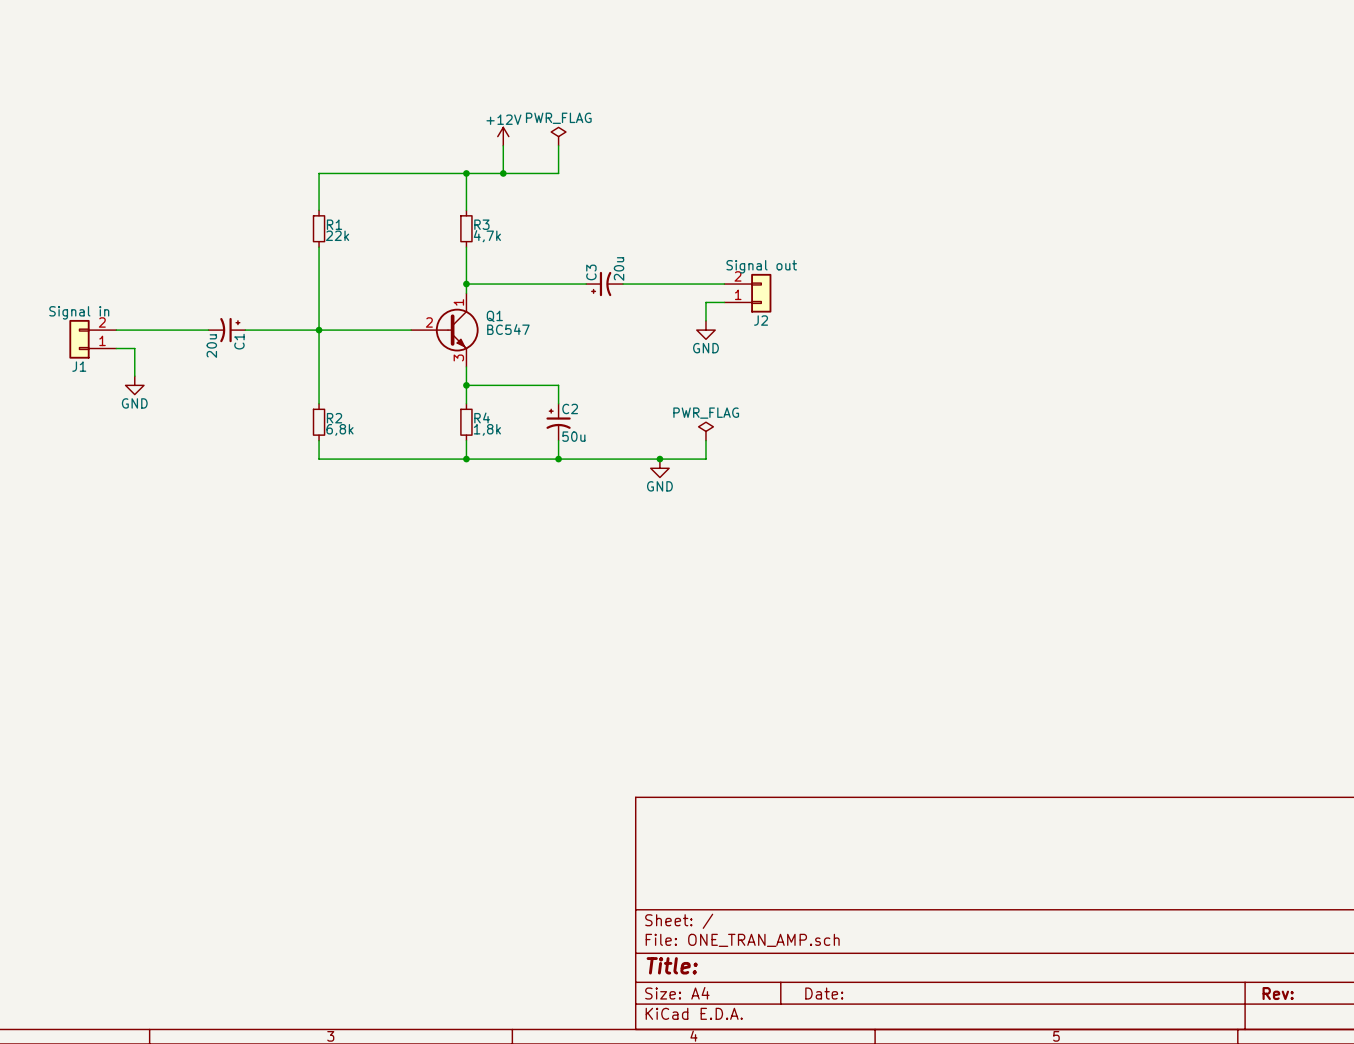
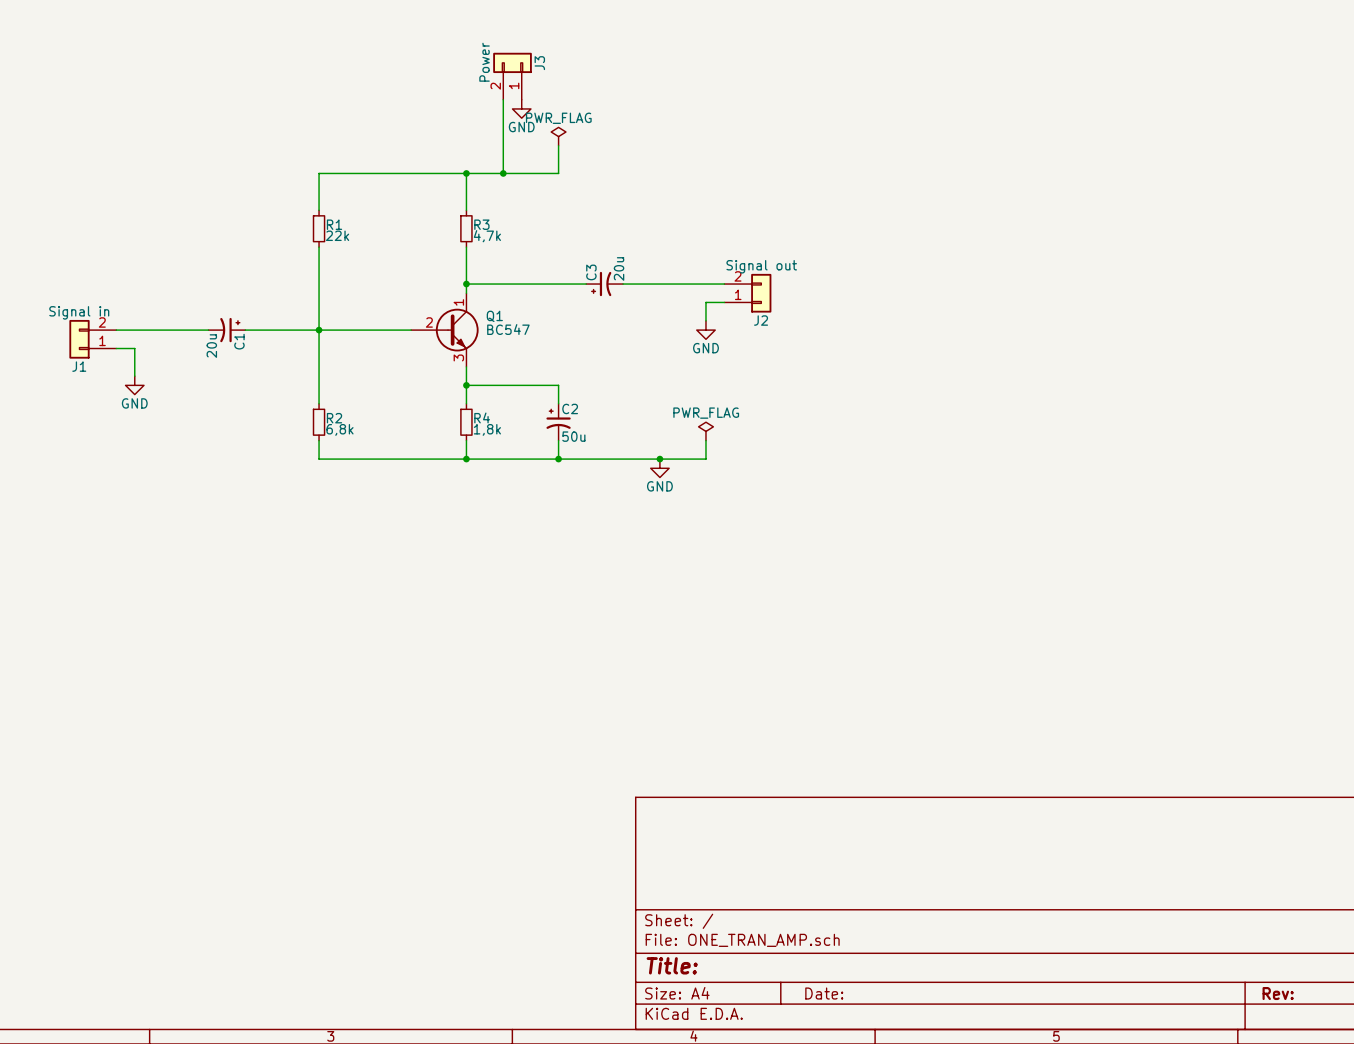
J3: none -> Power (512, 76)
wire: none -> (503, 99) (503, 145)
power symbol: none -> GND (521, 108)
power symbol: +12V (503, 136) -> none

